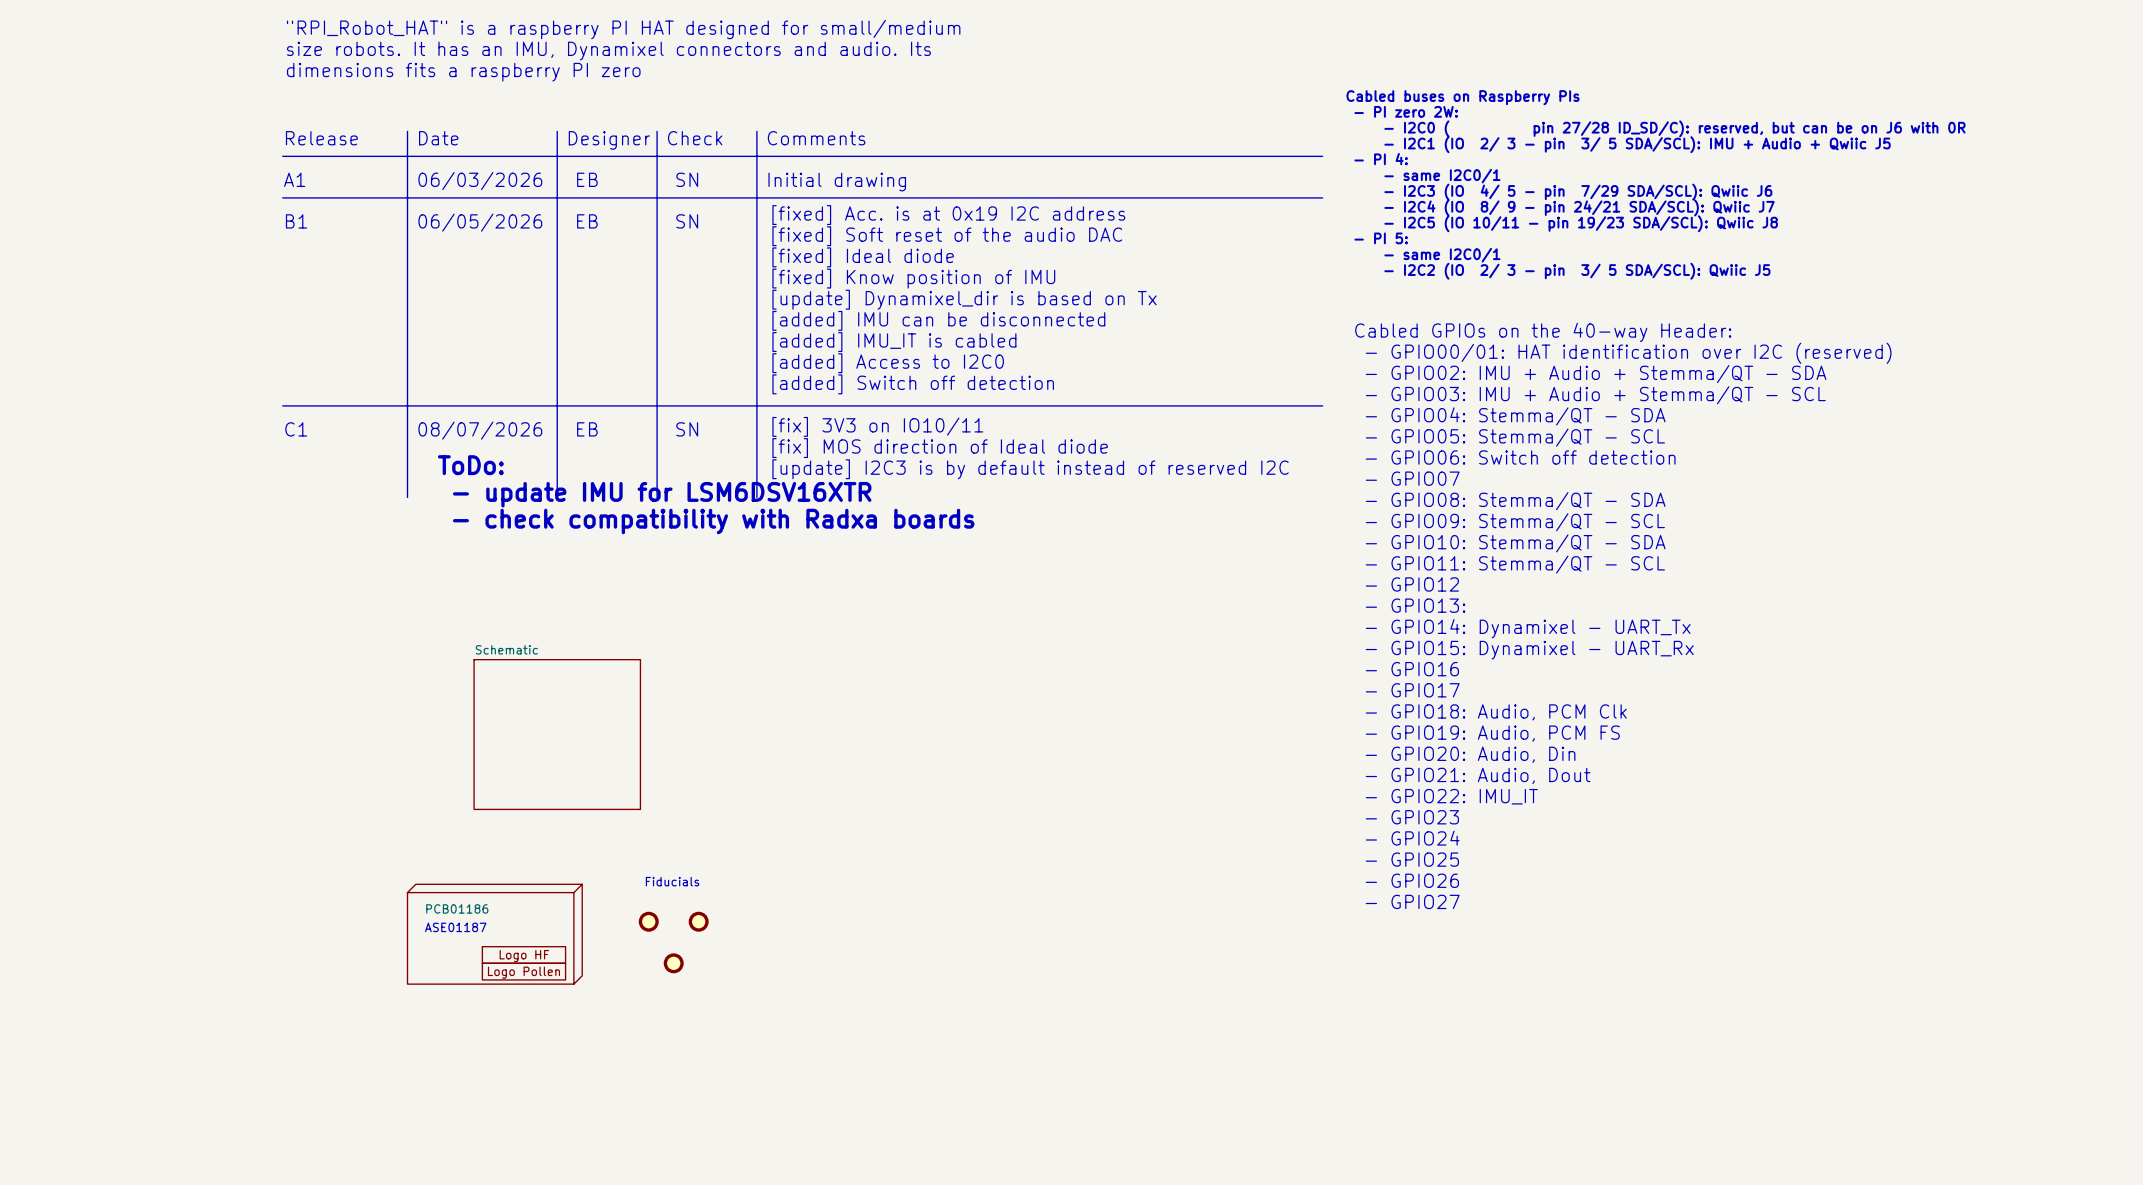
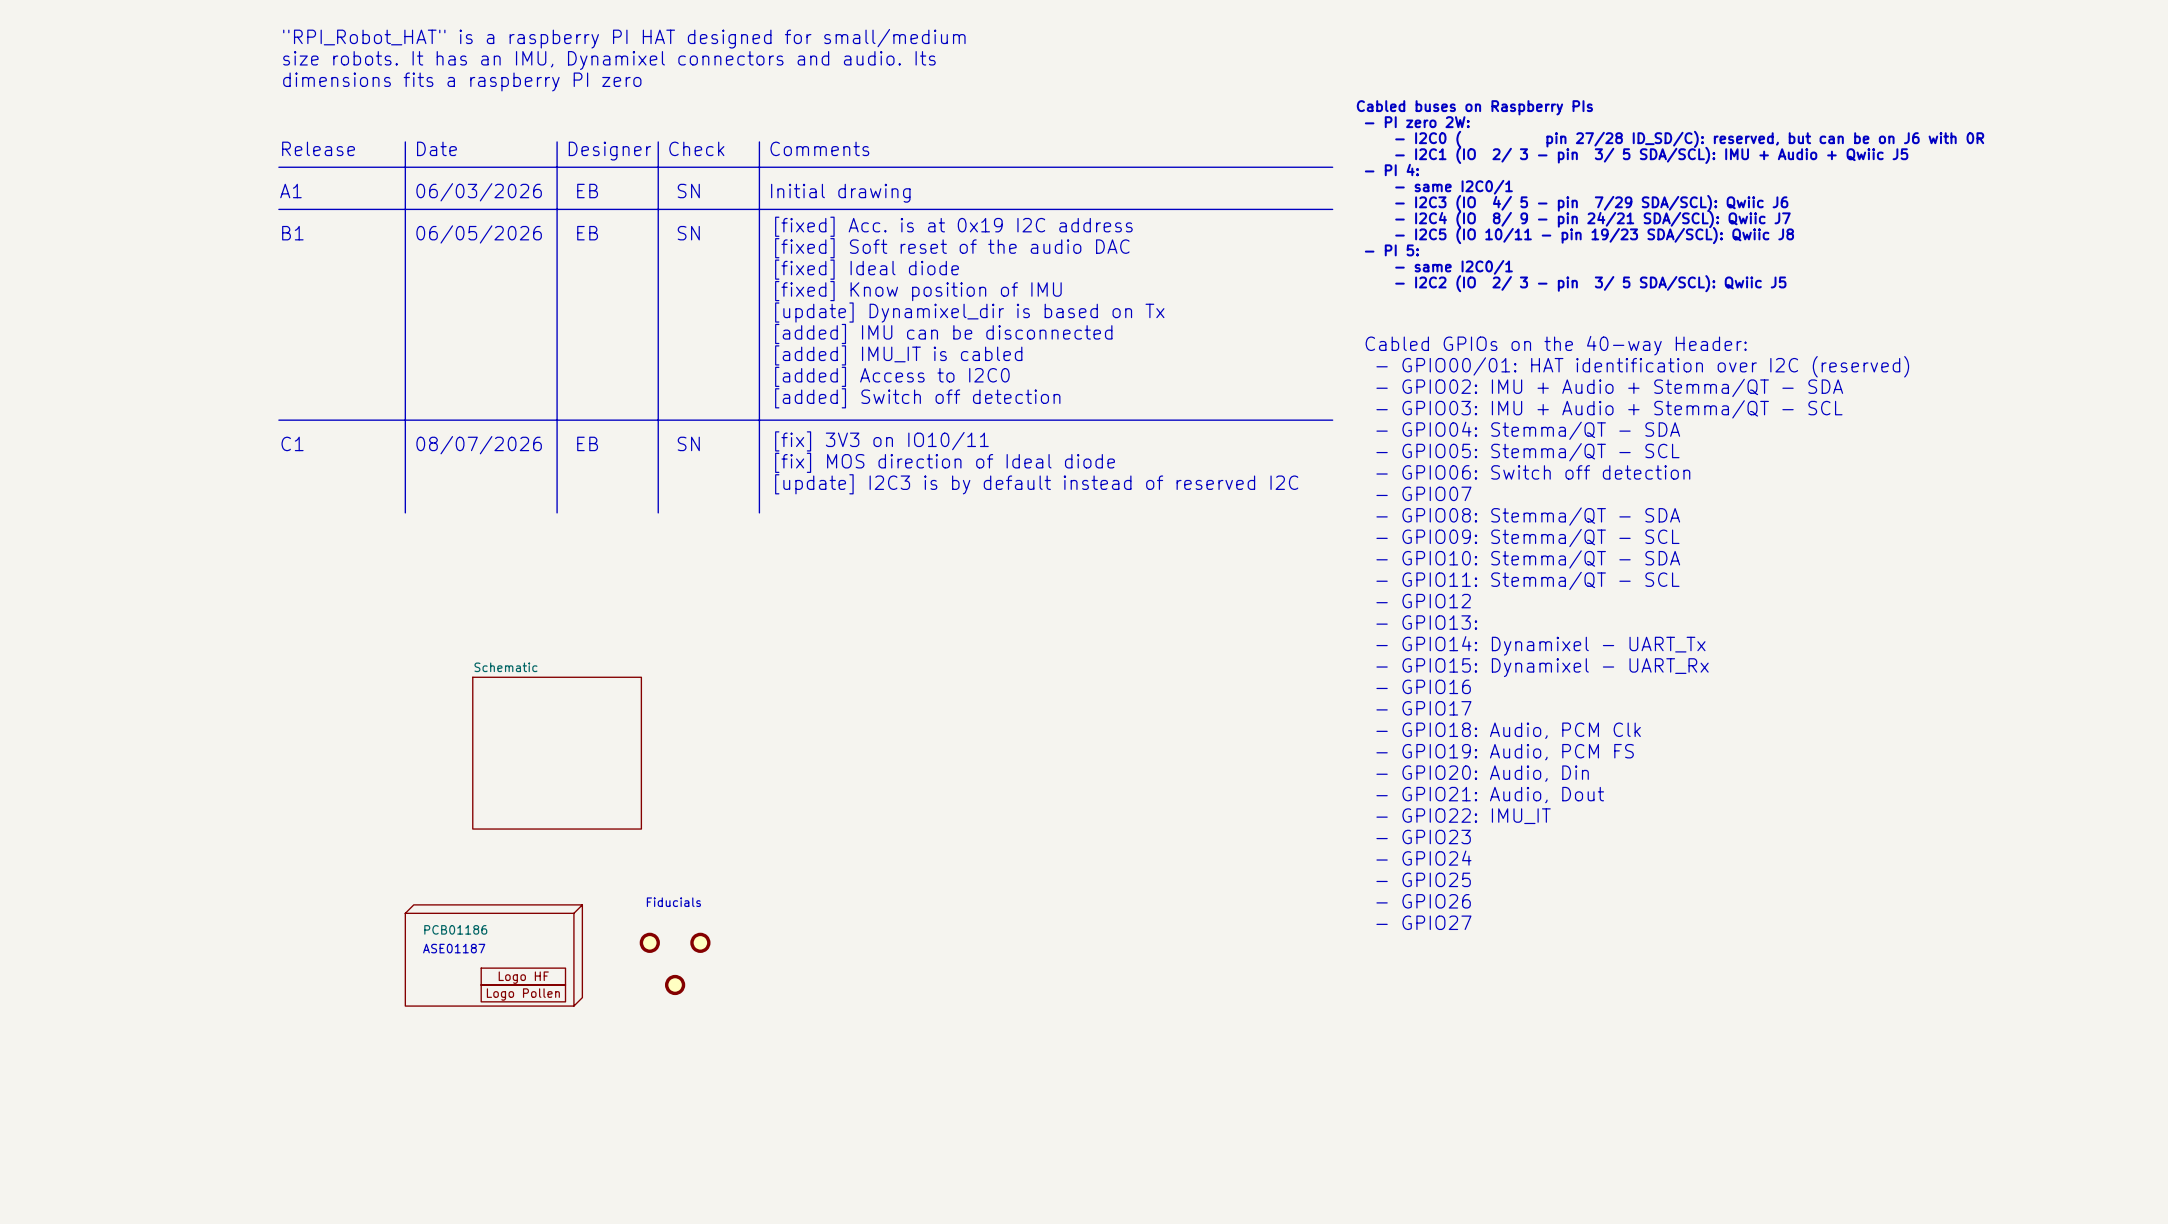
text: ToDo: (470, 465) -> none
text: - update IMU for LSM6DSV16XTR (662, 494) -> none
text: - check compatibility with Radxa boards (713, 521) -> none

